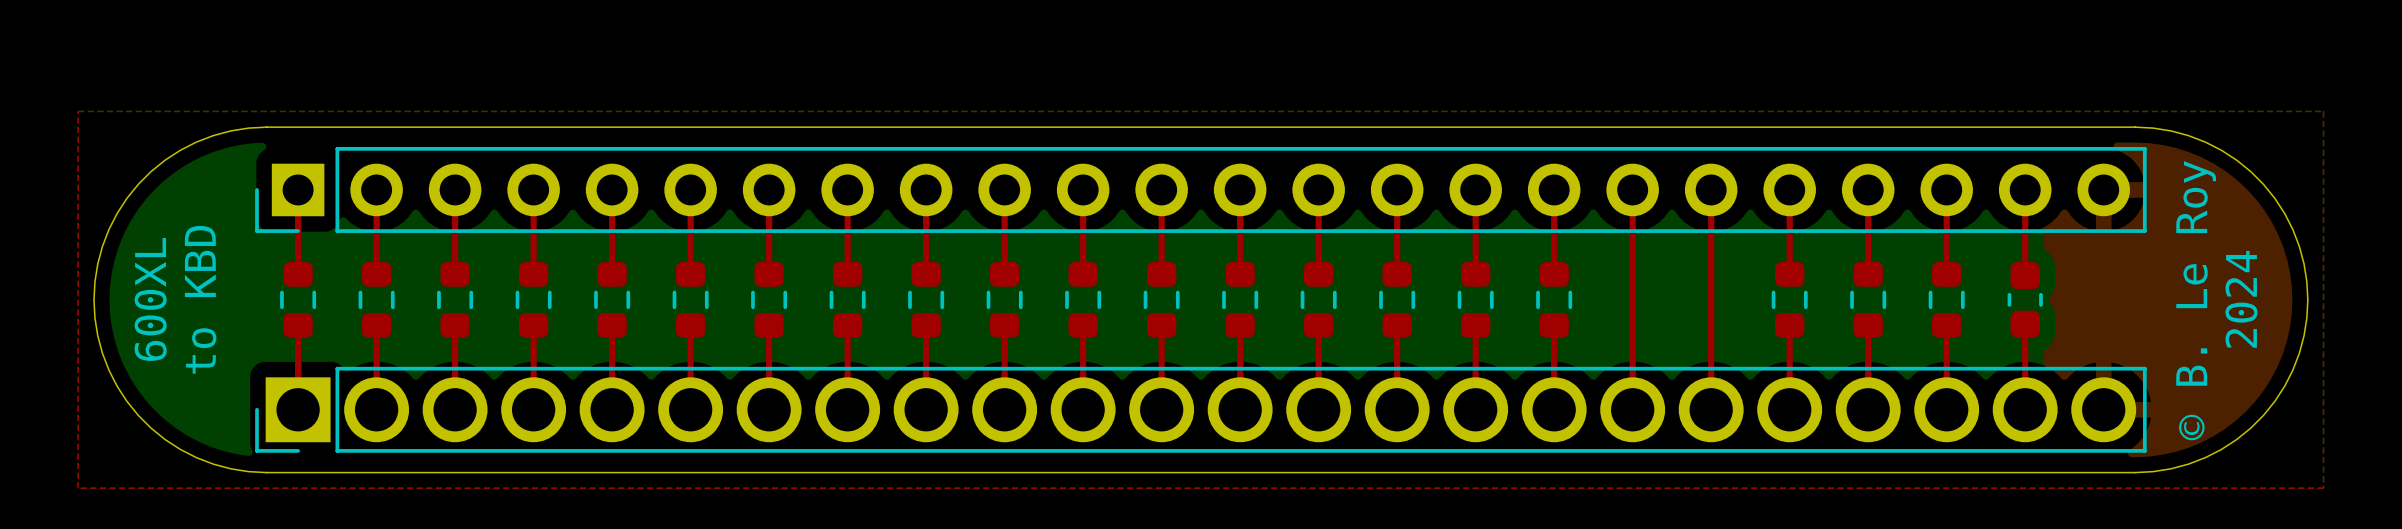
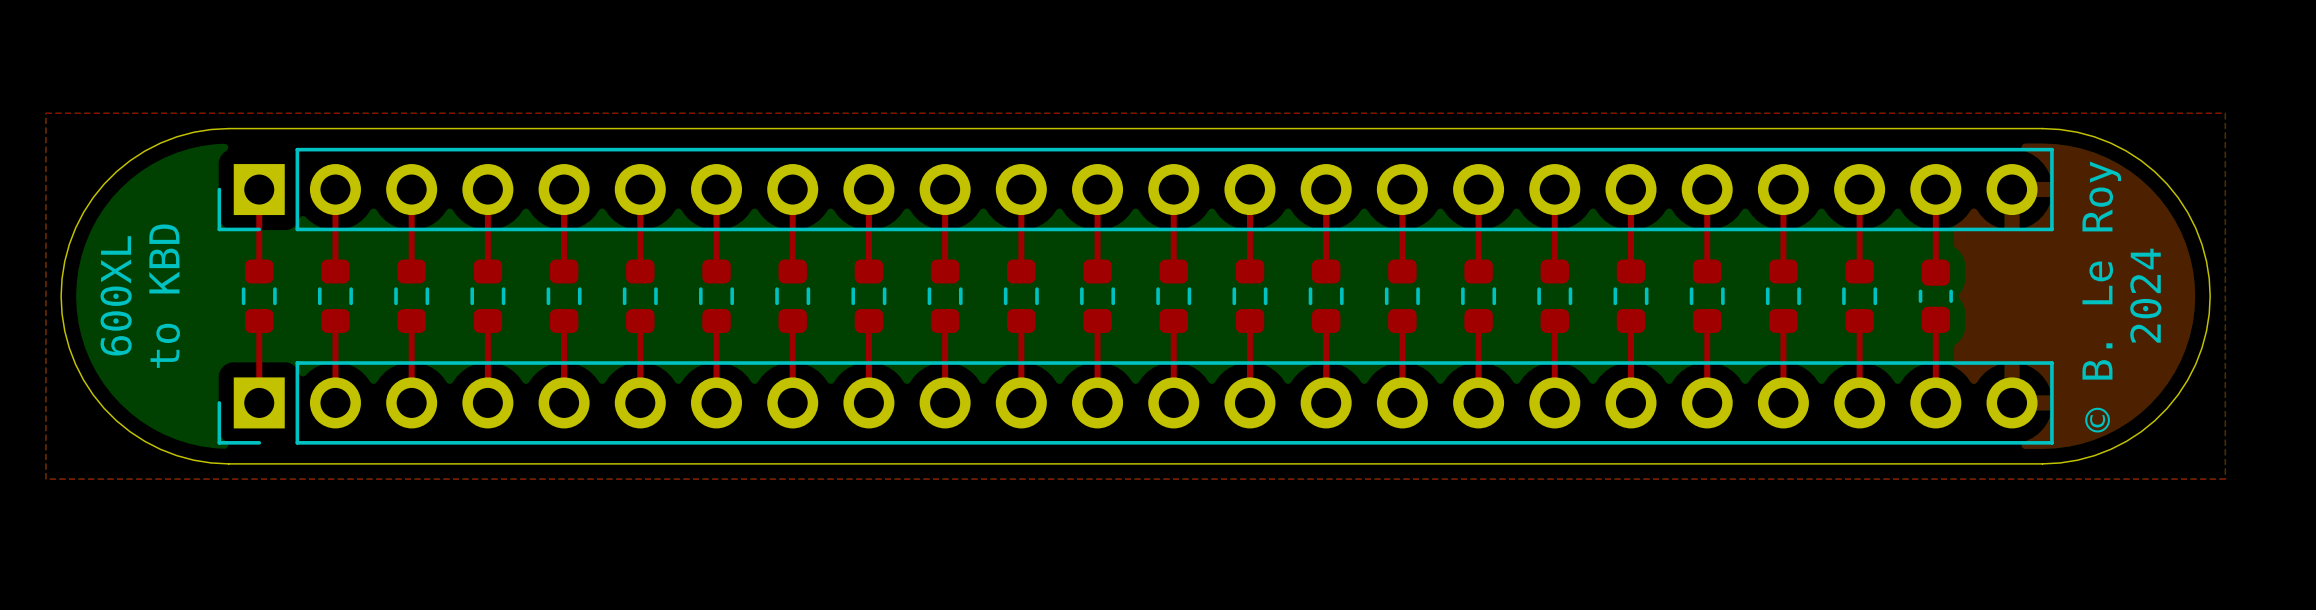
top track: (1632, 274) (1632, 325) -> none
top track: (1711, 274) (1711, 325) -> none
part: none -> (1554, 296)
part: none -> (1630, 296)
part footprint: [255, 366, 2147, 453] -> [217, 361, 2054, 445]

